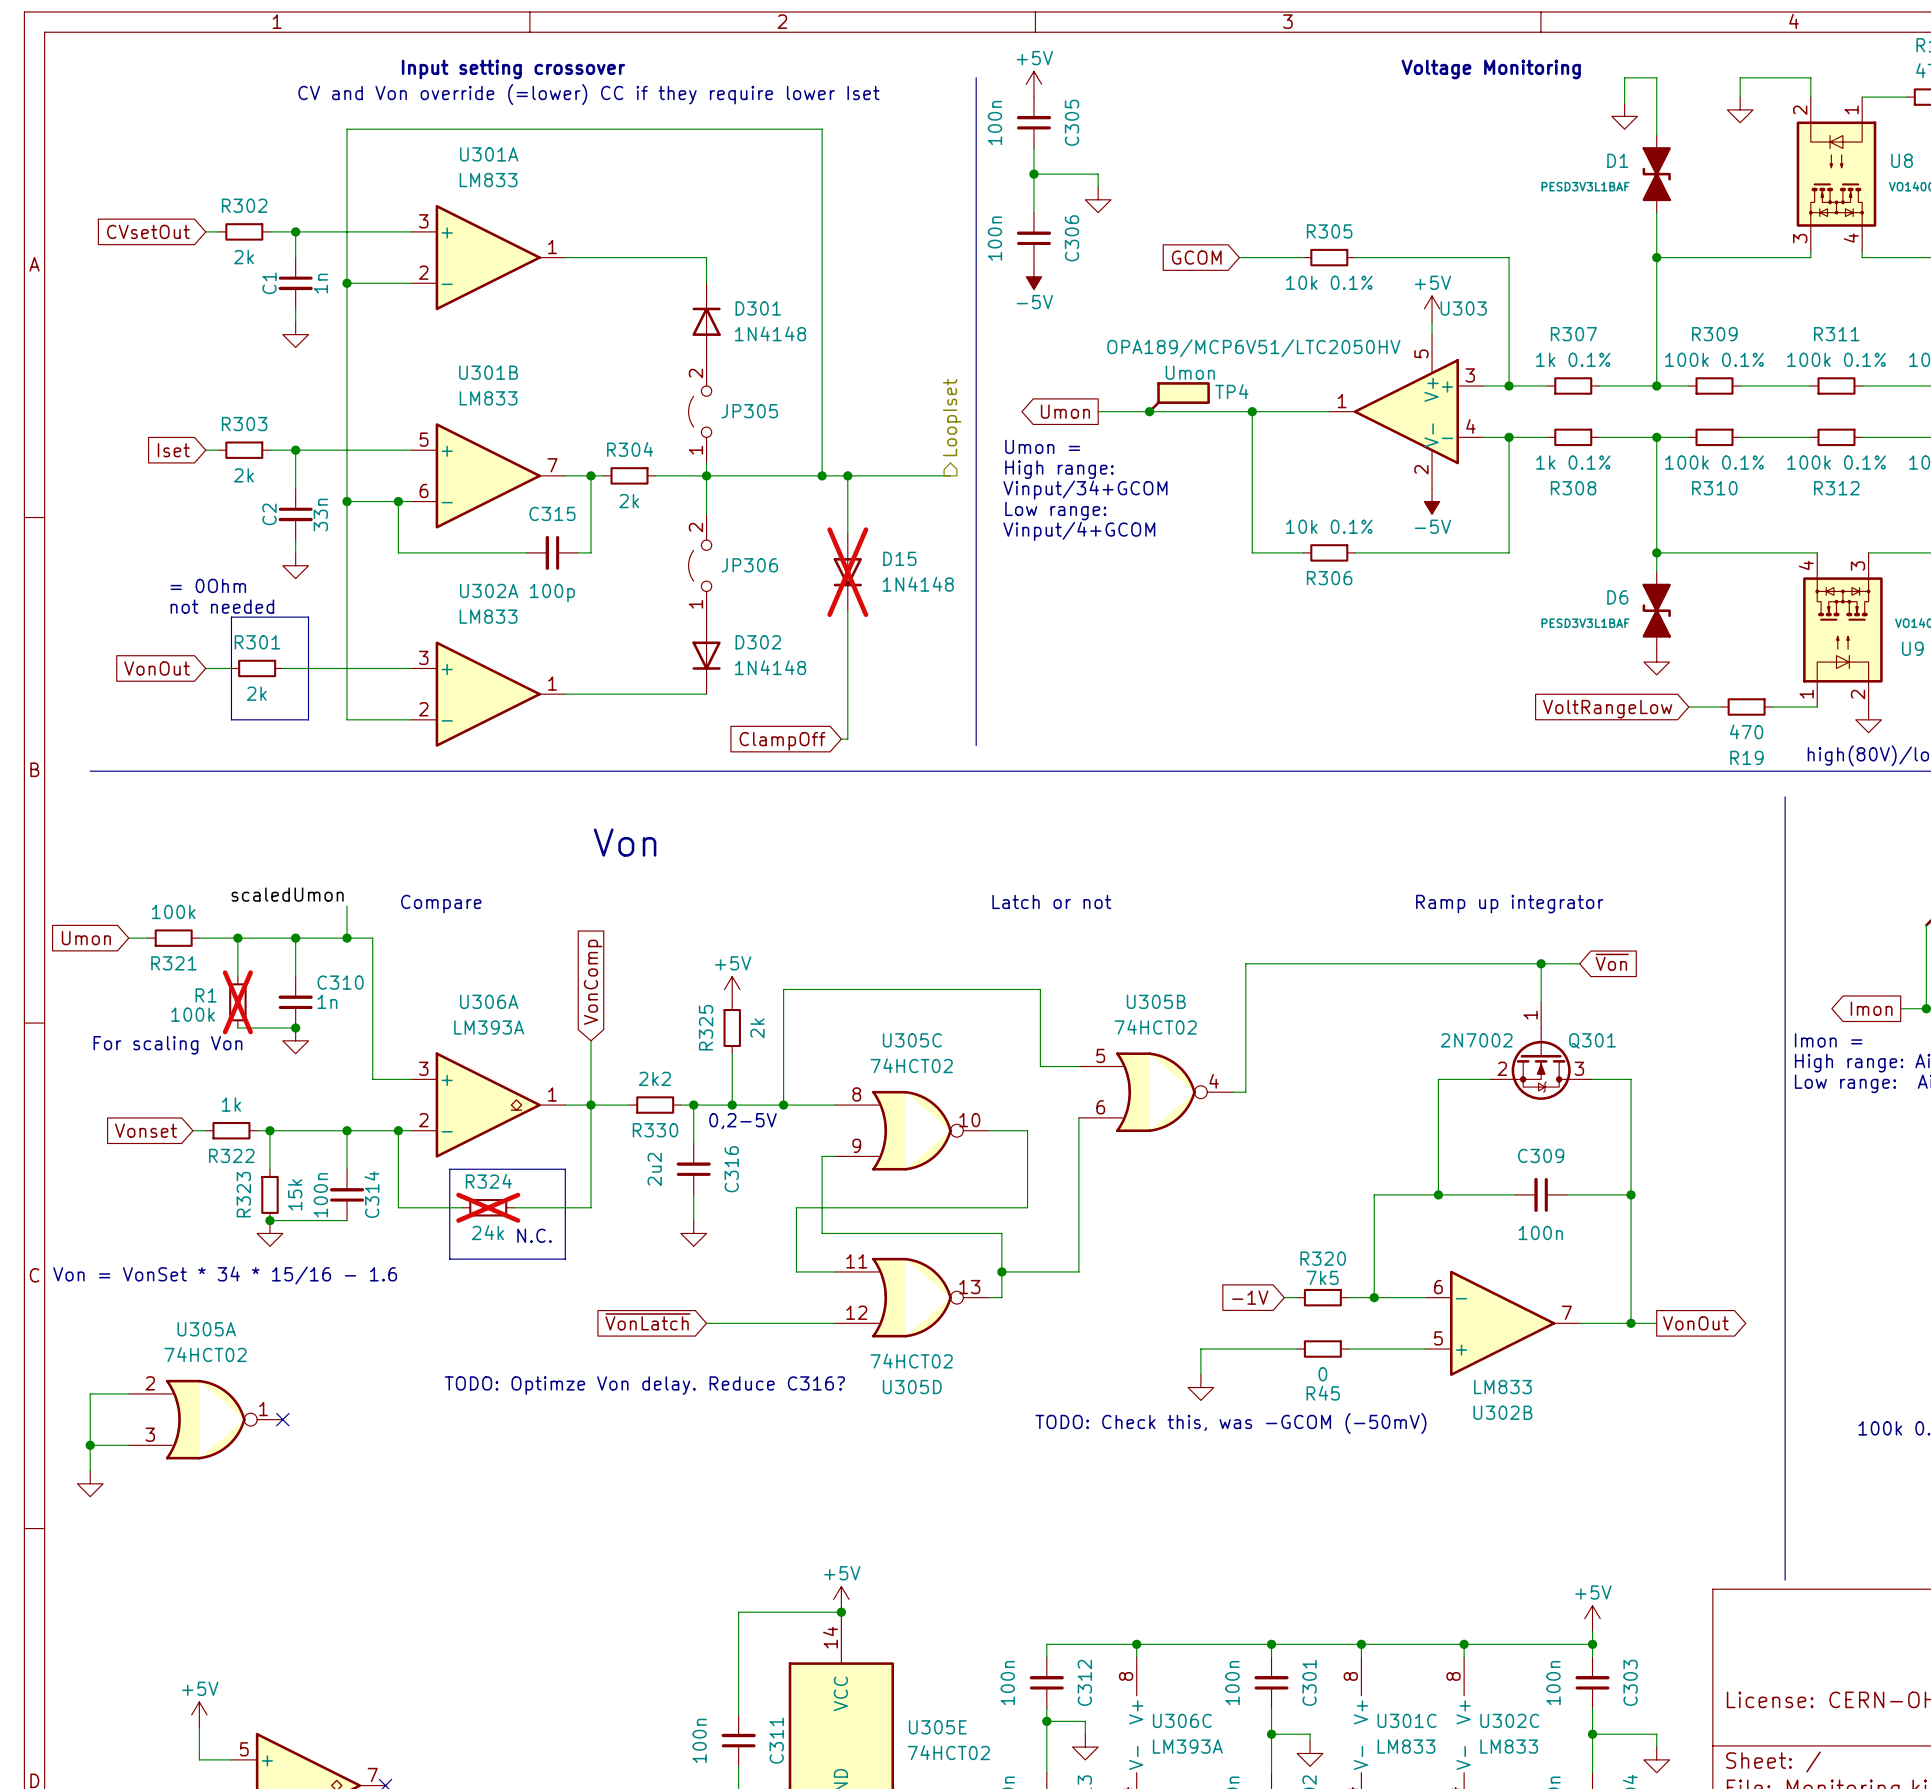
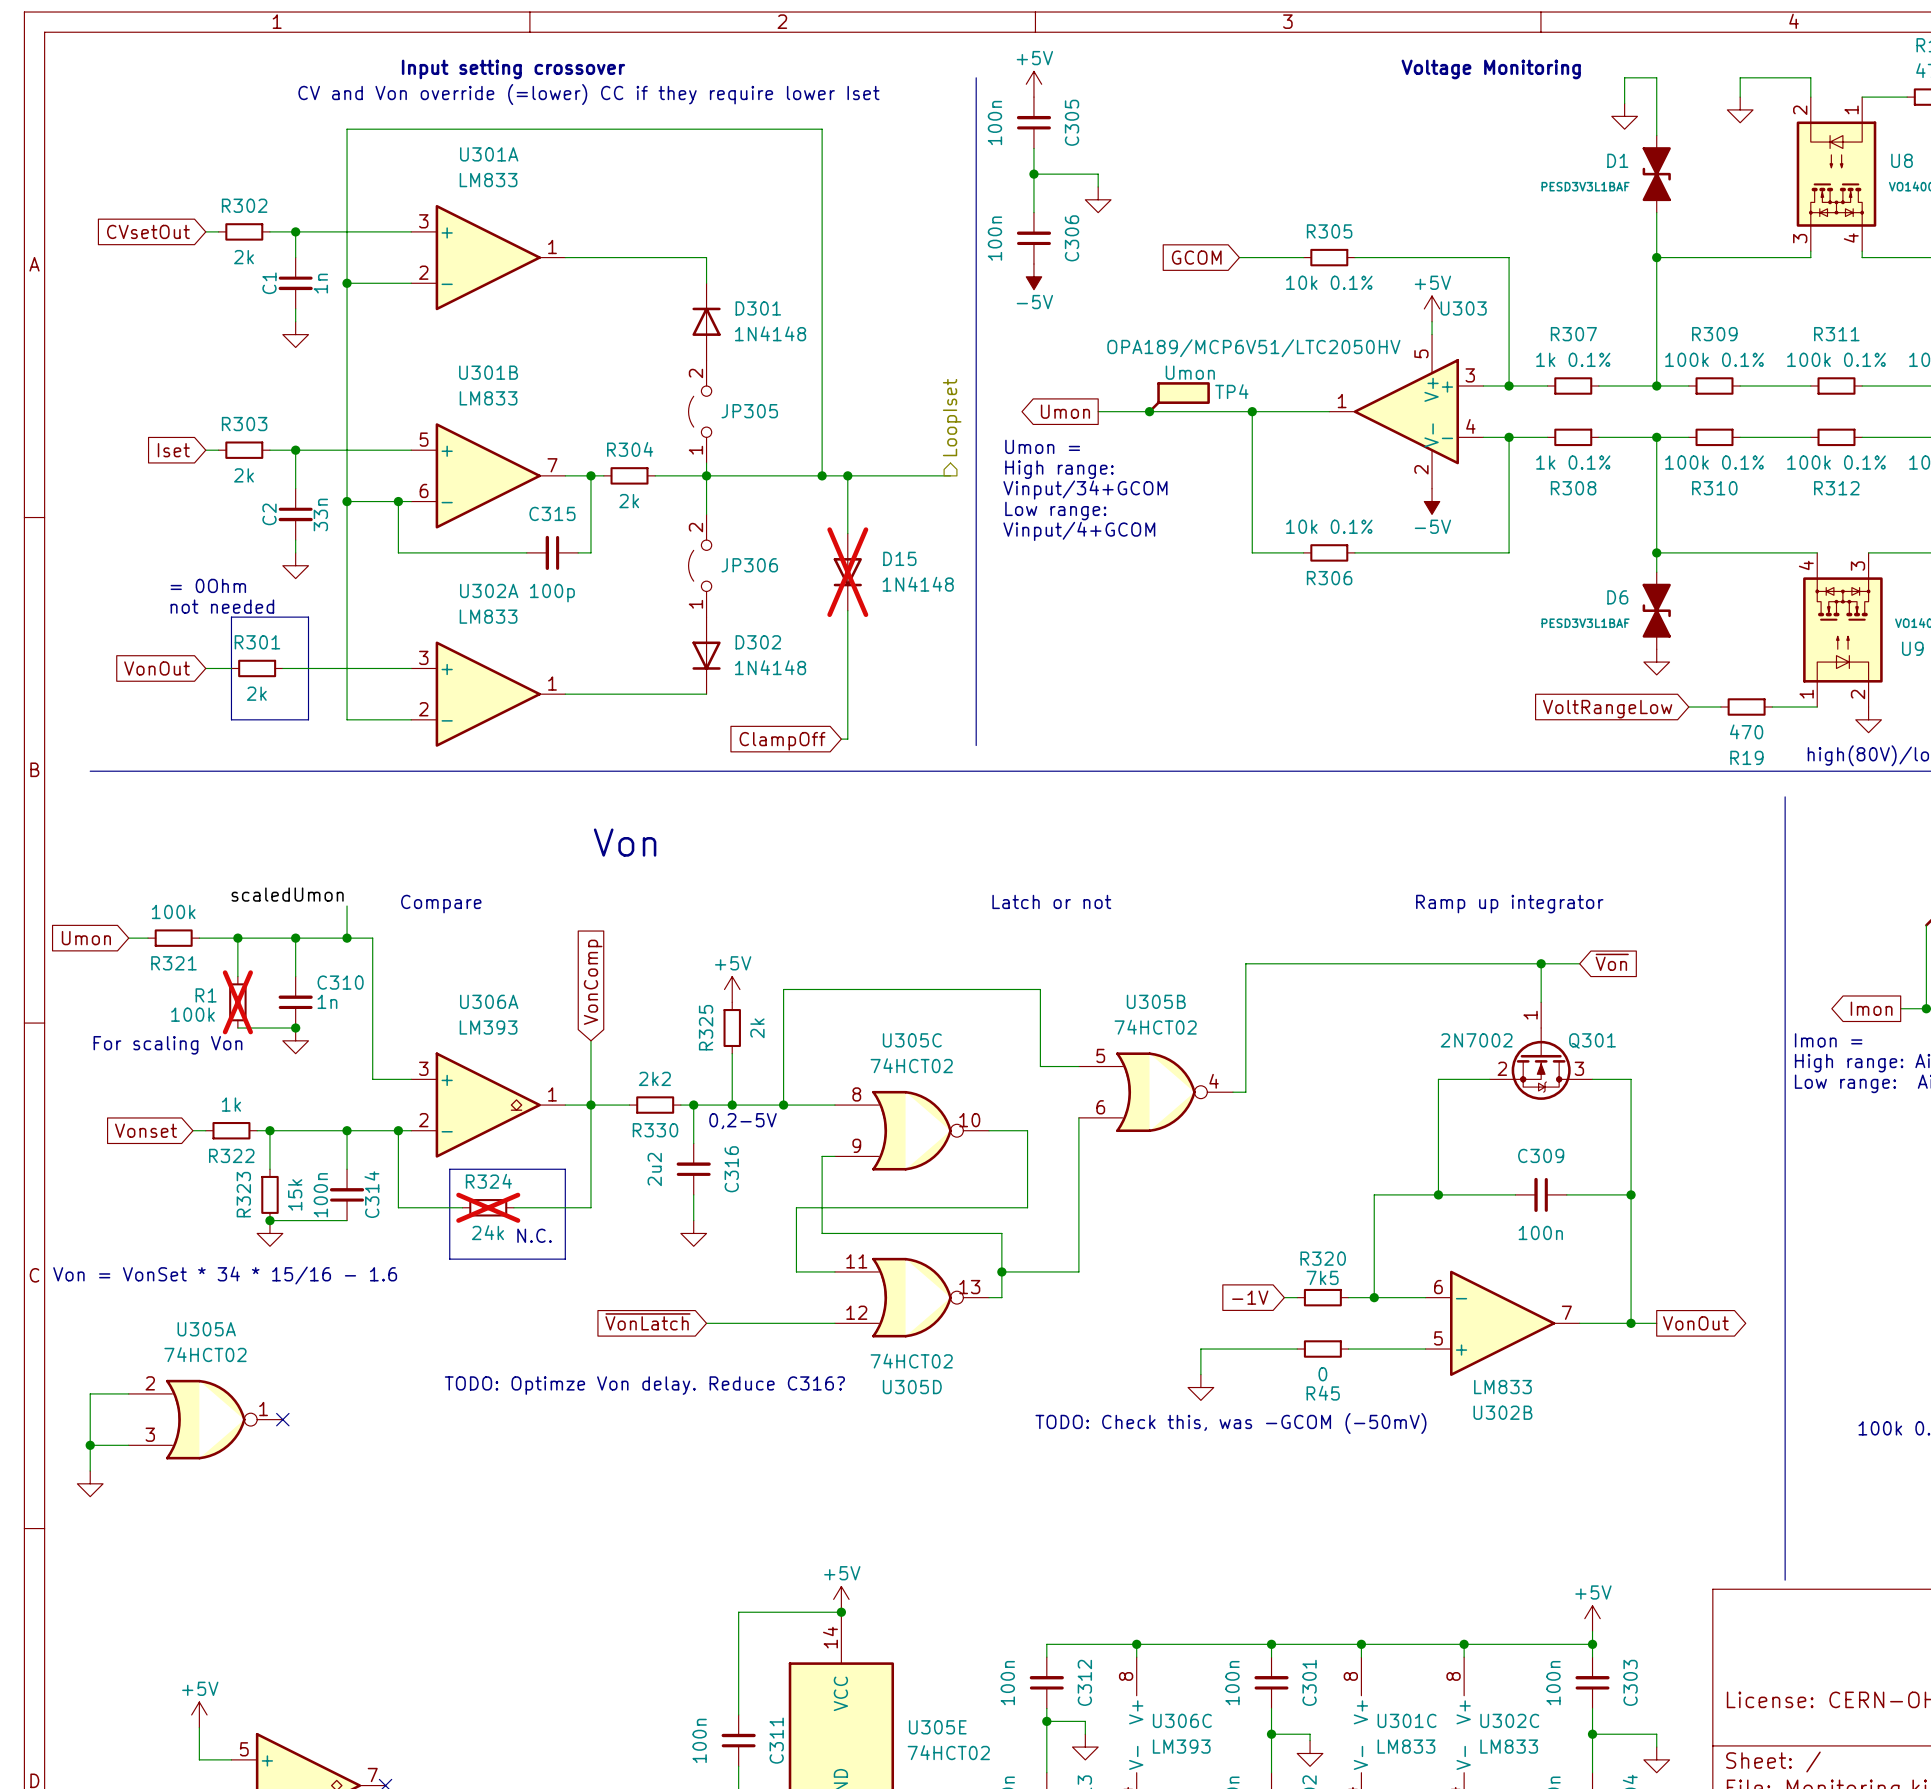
U306A value: LM393A (489, 1027) -> LM393 (488, 1027)
U306C value: LM393A (1187, 1746) -> LM393 (1181, 1746)

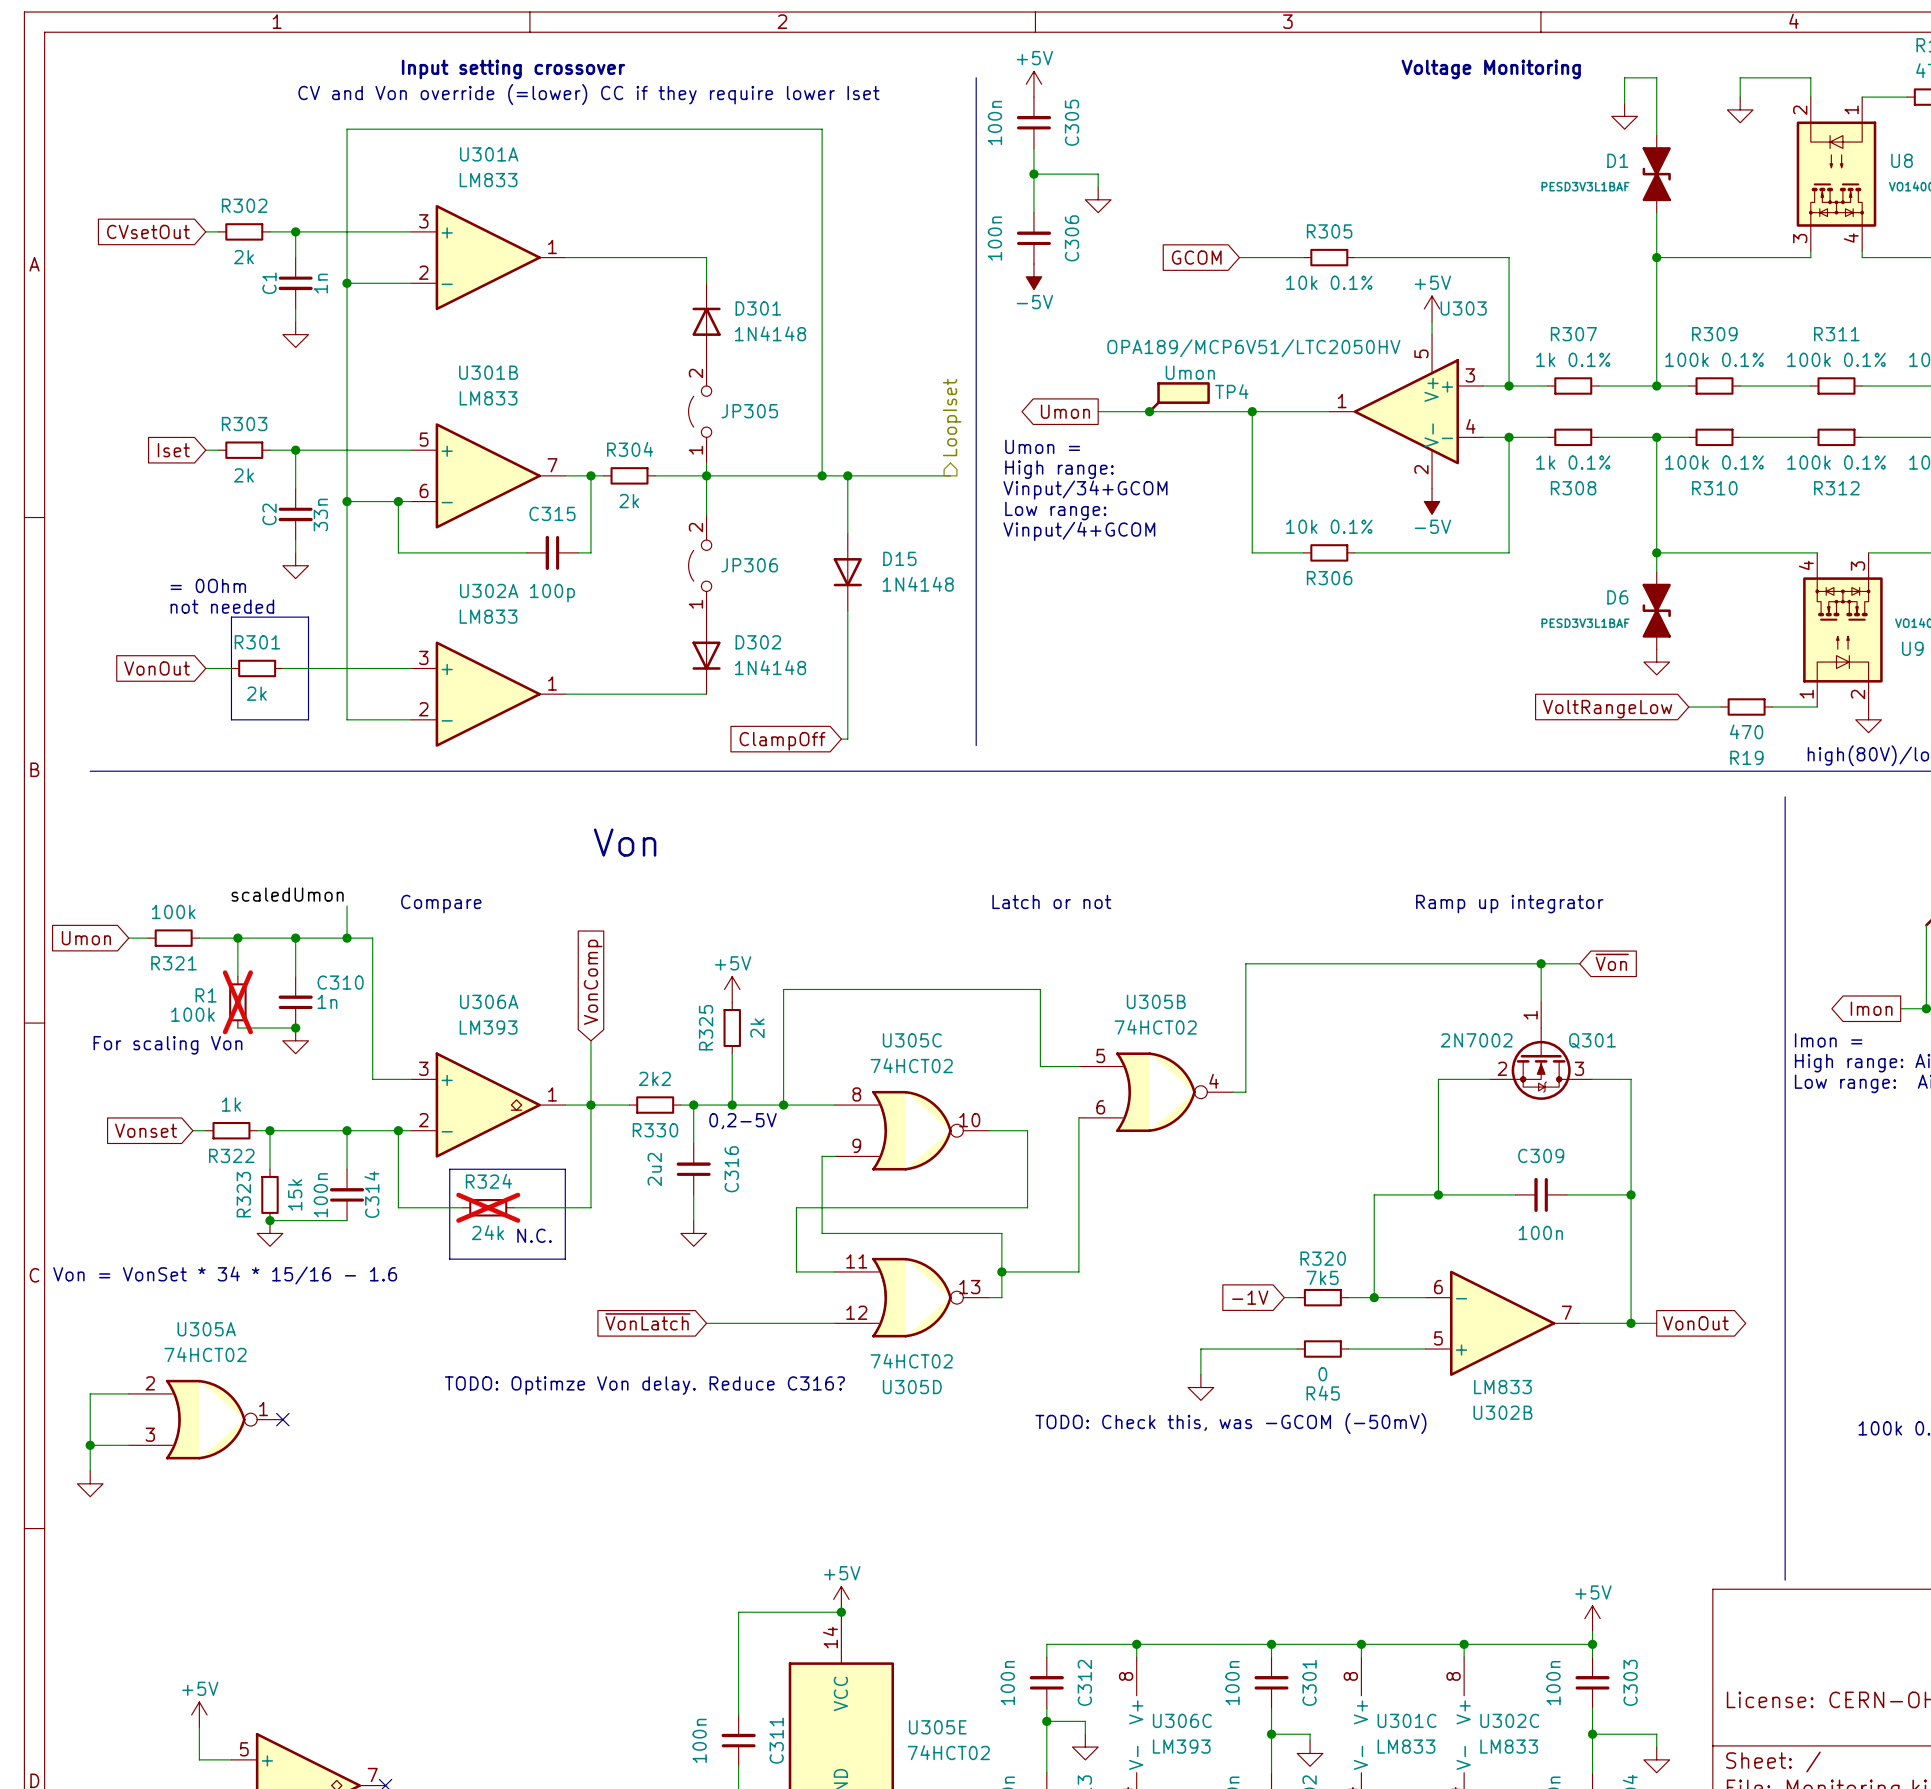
D15 do-not-place cross: (847, 572) -> none

